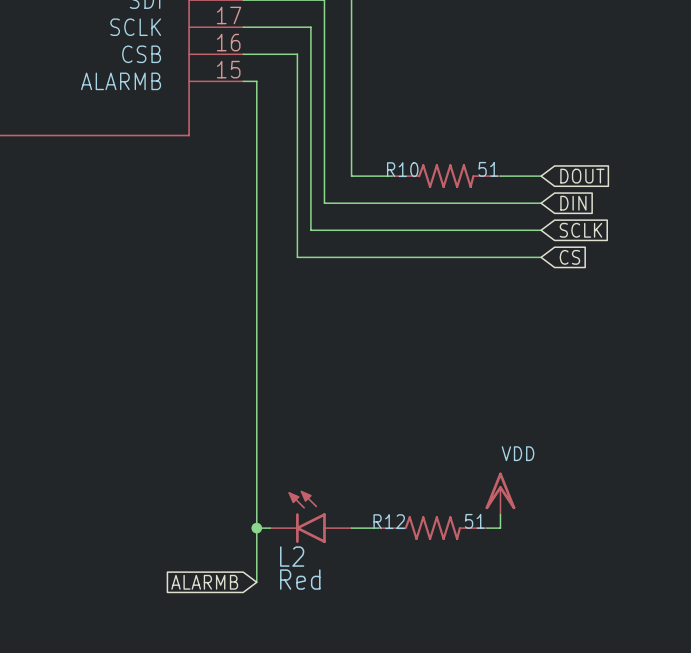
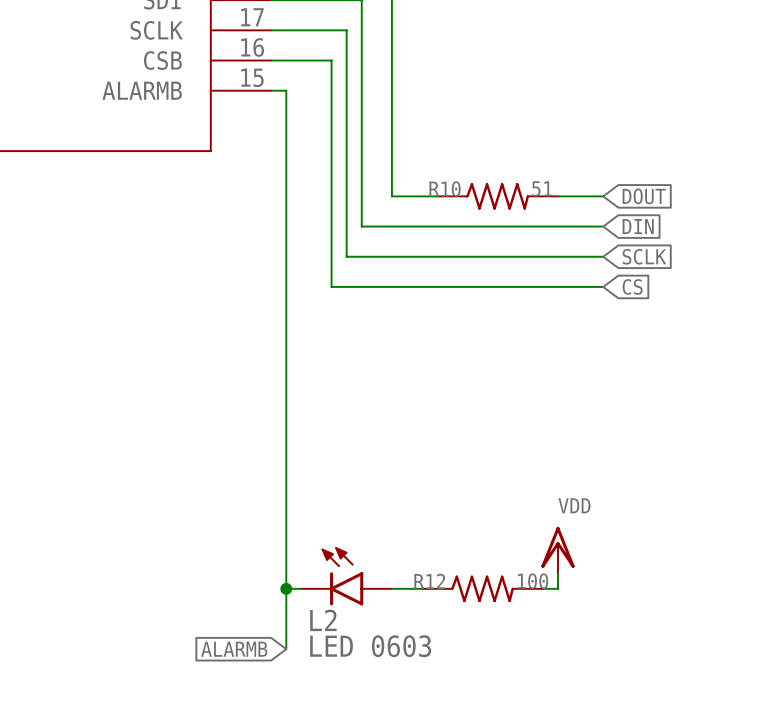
R12 value: 51 (474, 521) -> 100 (533, 581)
L2 value: Red (300, 579) -> LED 0603 (370, 646)

